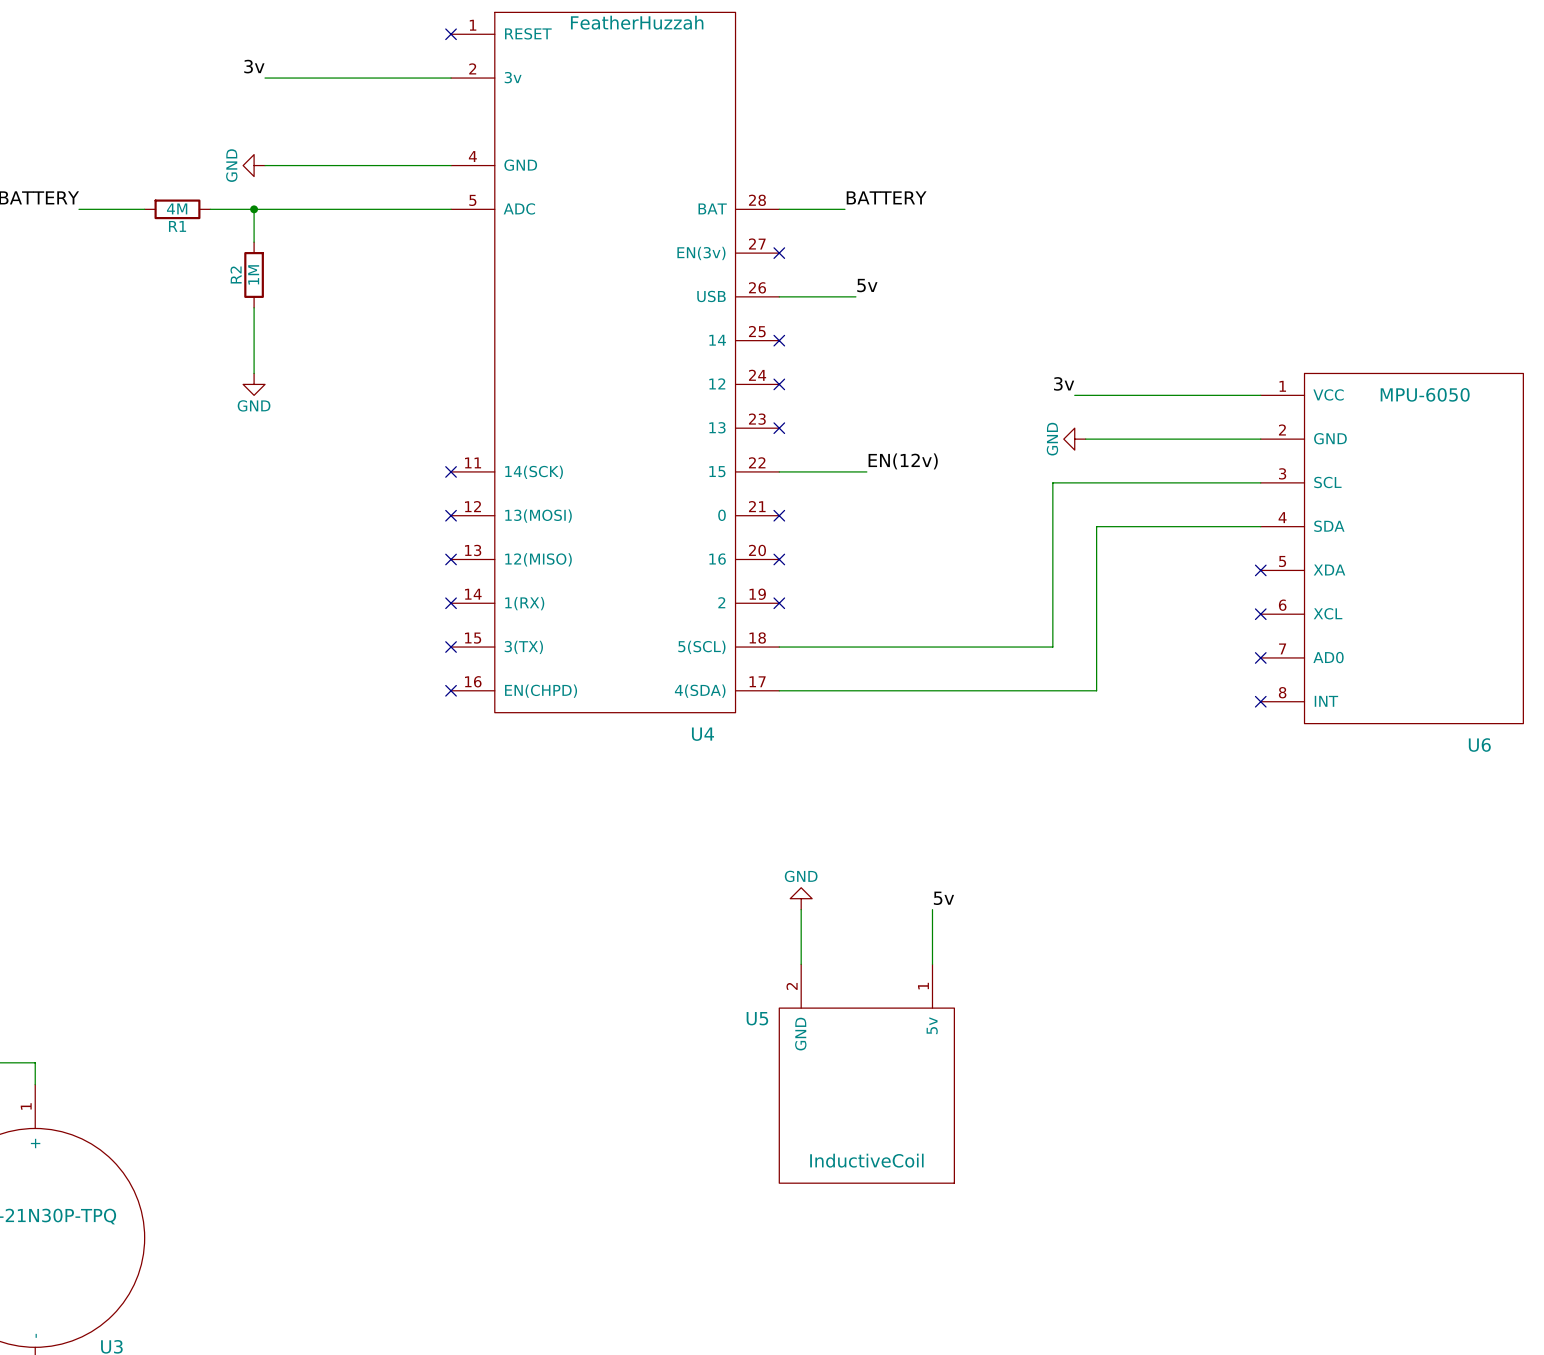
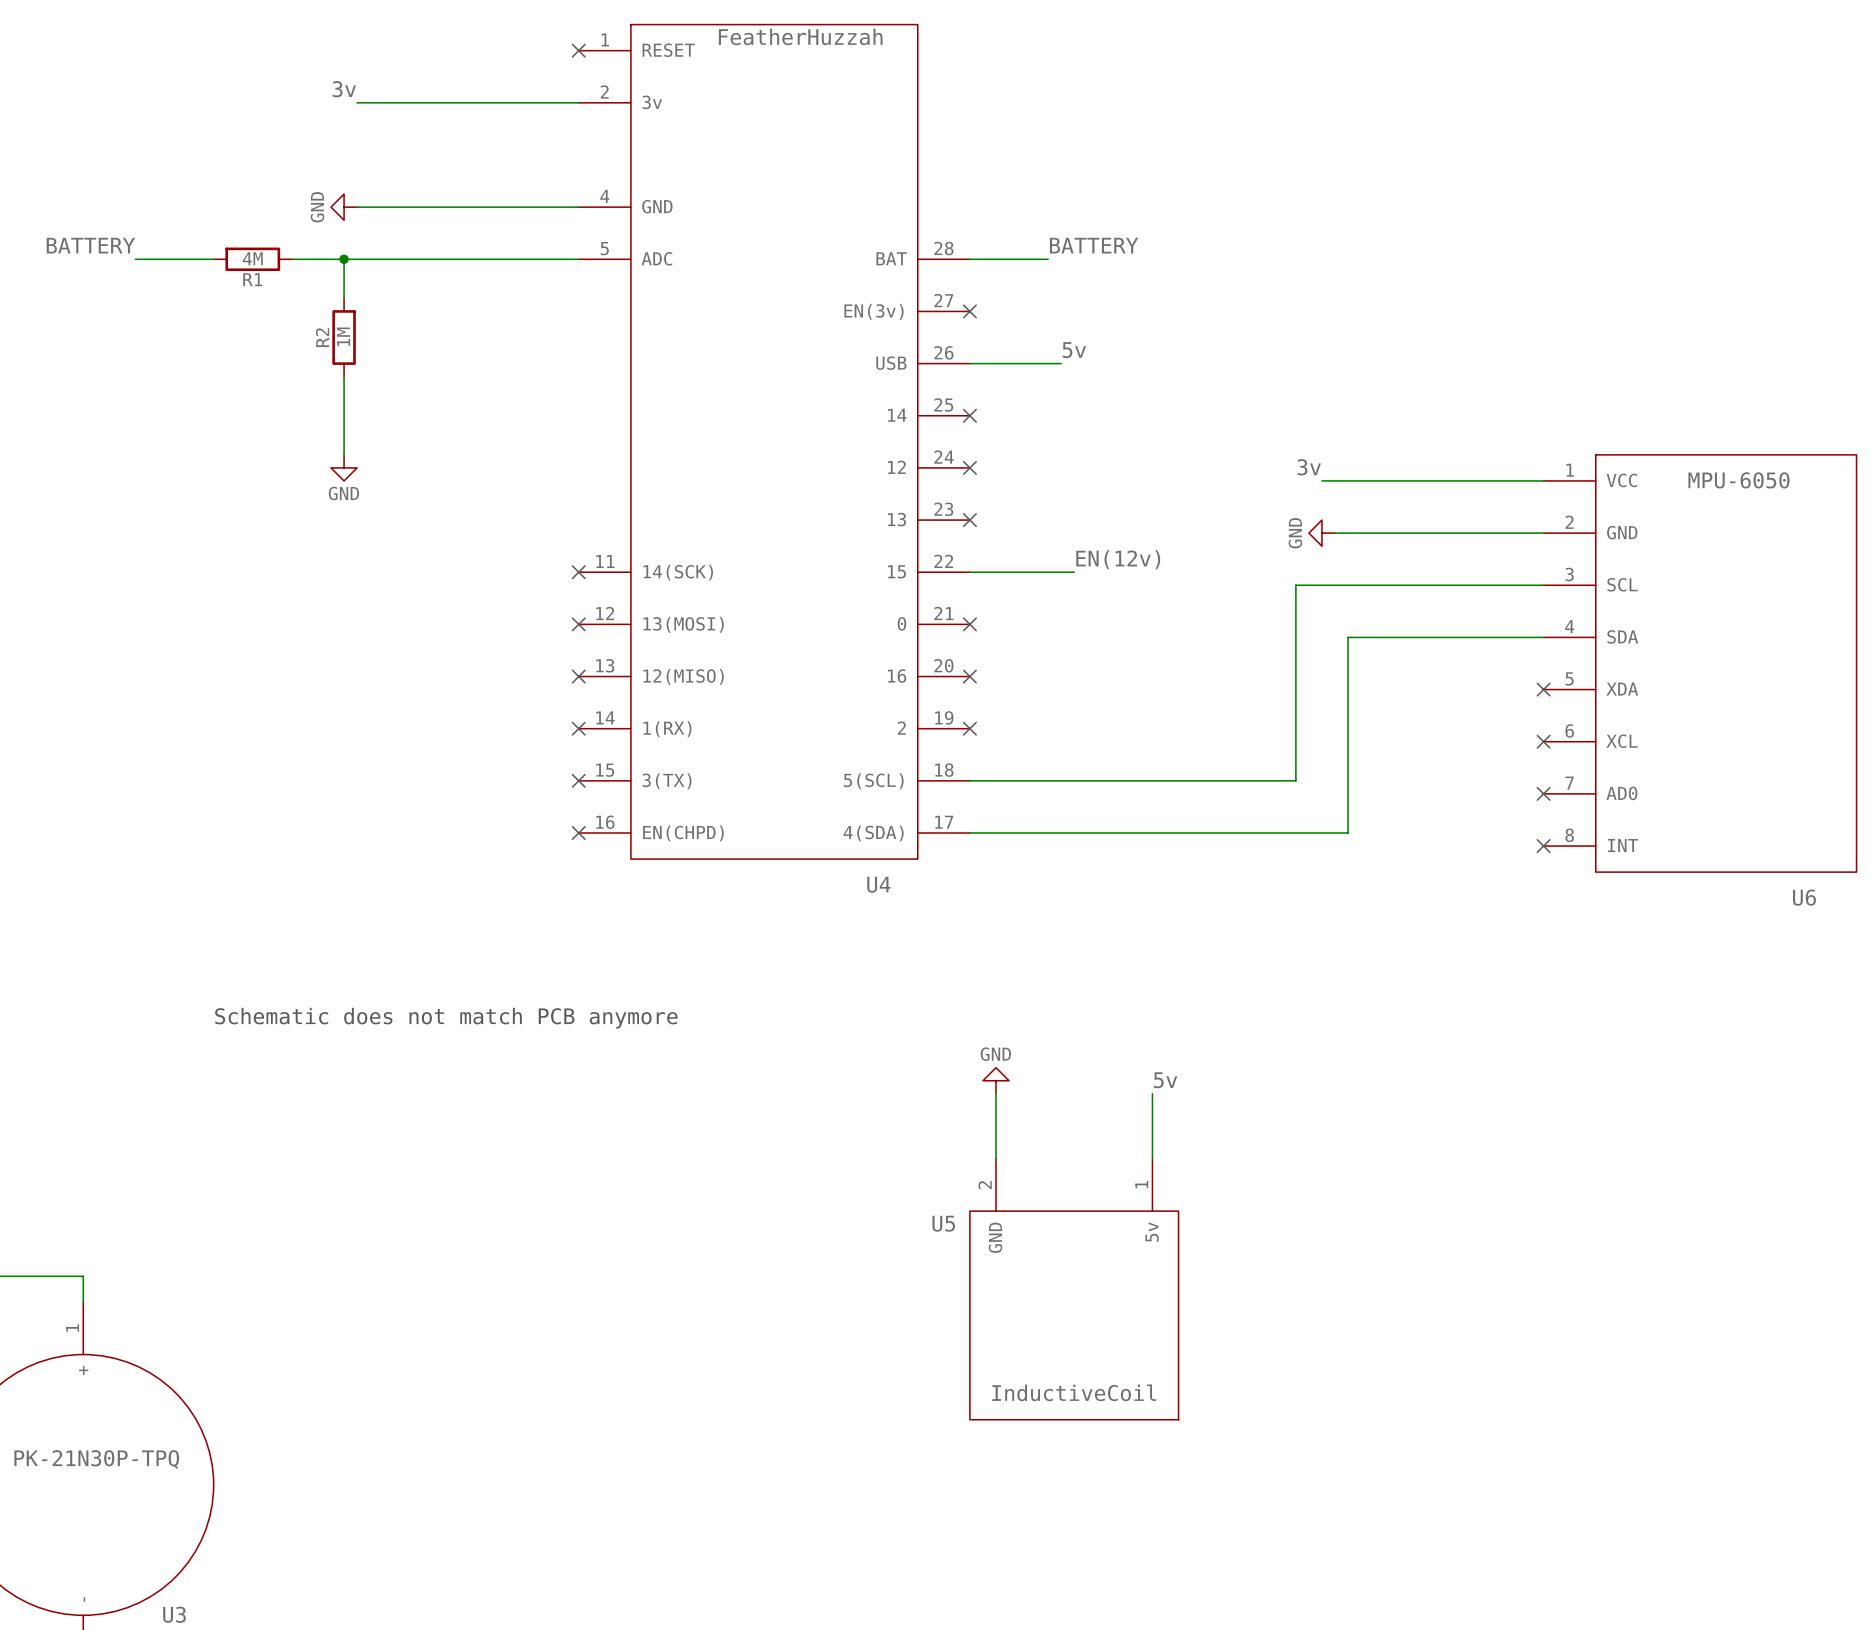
text: none -> Schematic does not match PCB anymore (446, 1018)

